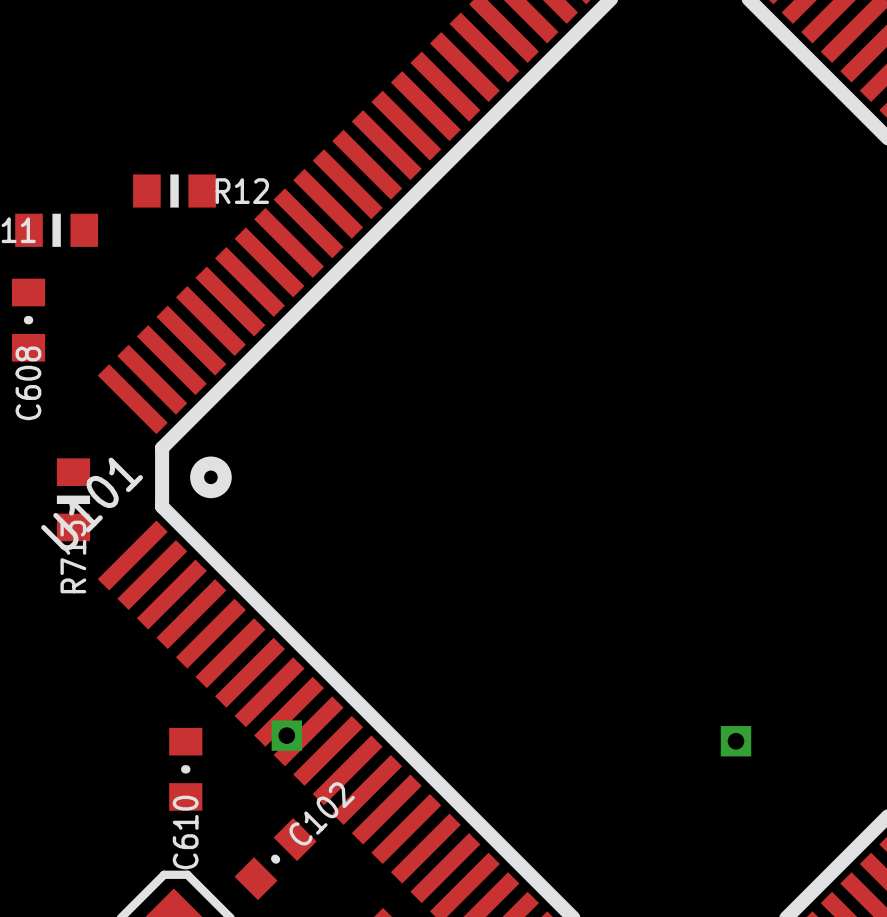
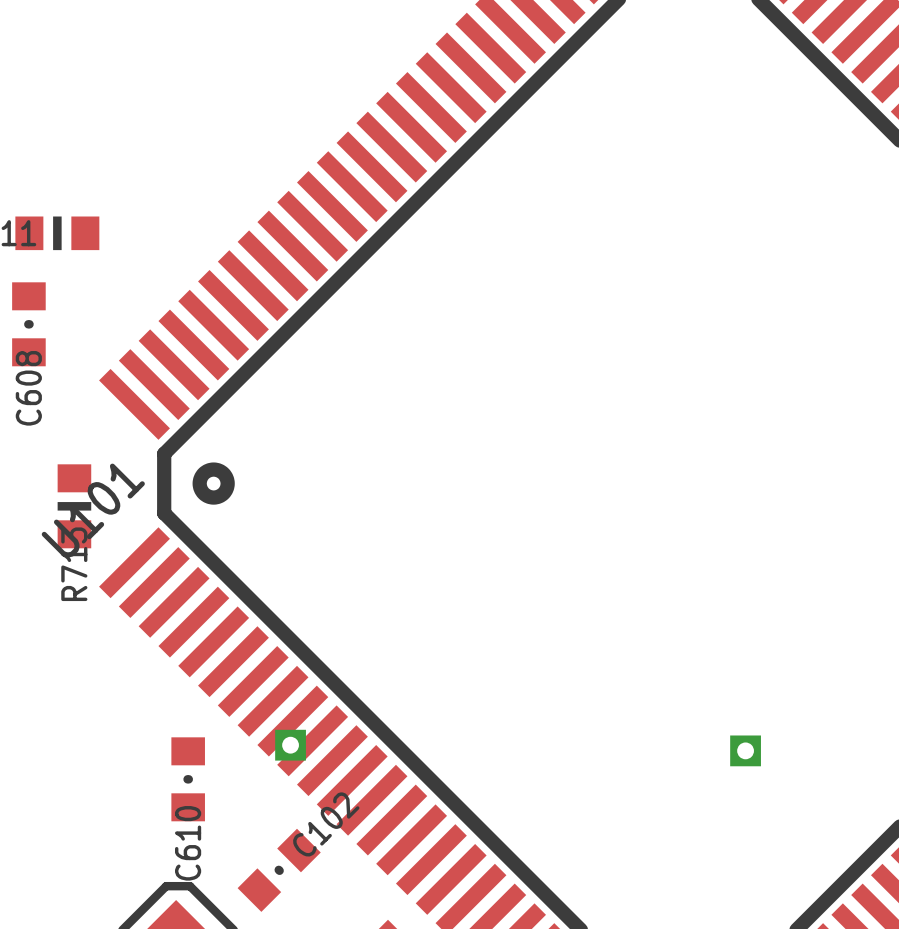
R12: (174, 191) -> none

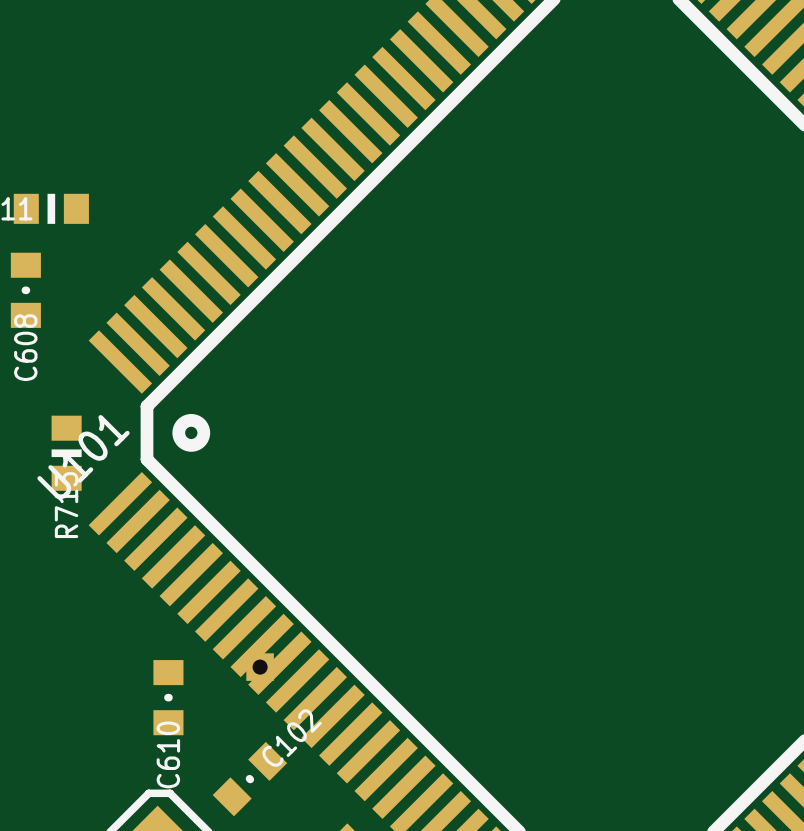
part: (745, 750) -> none

